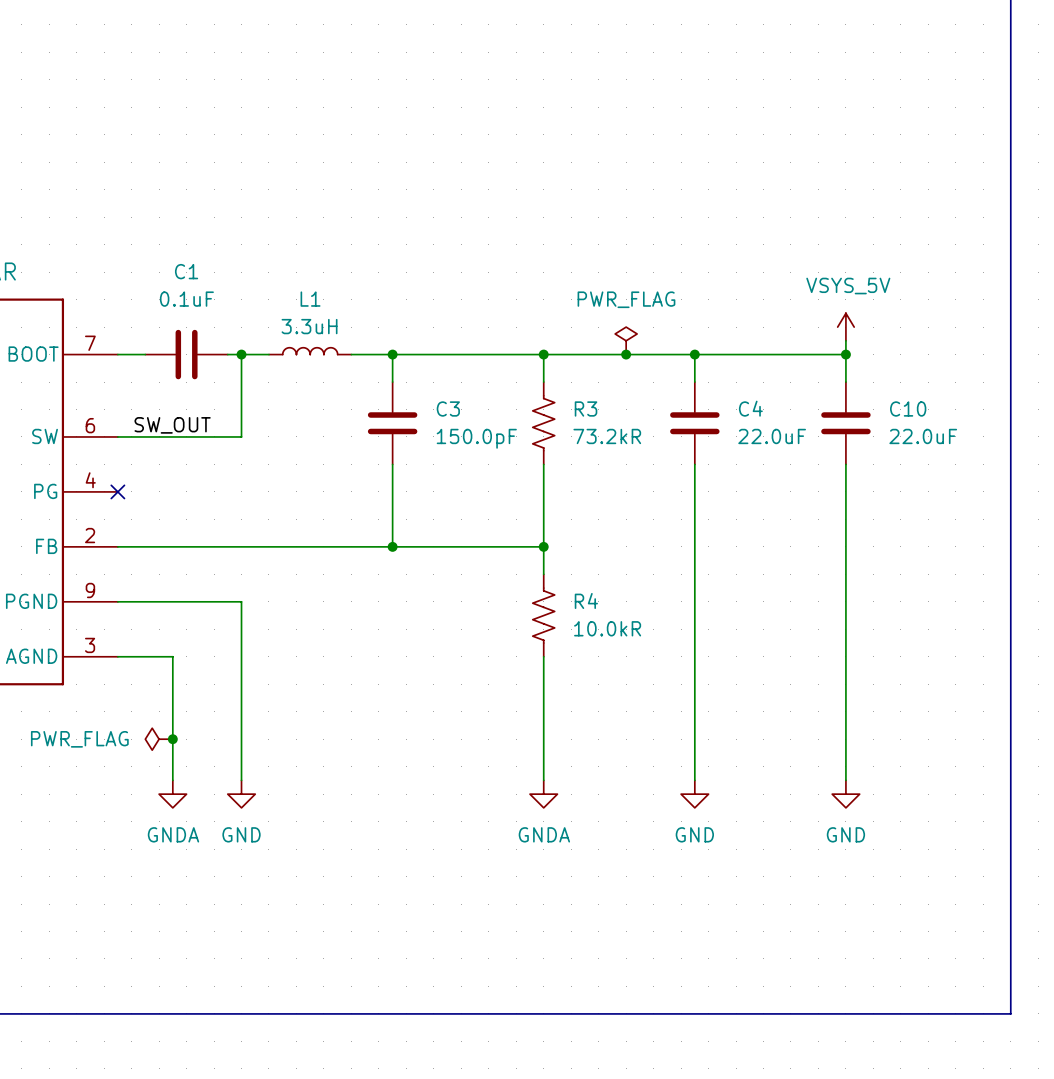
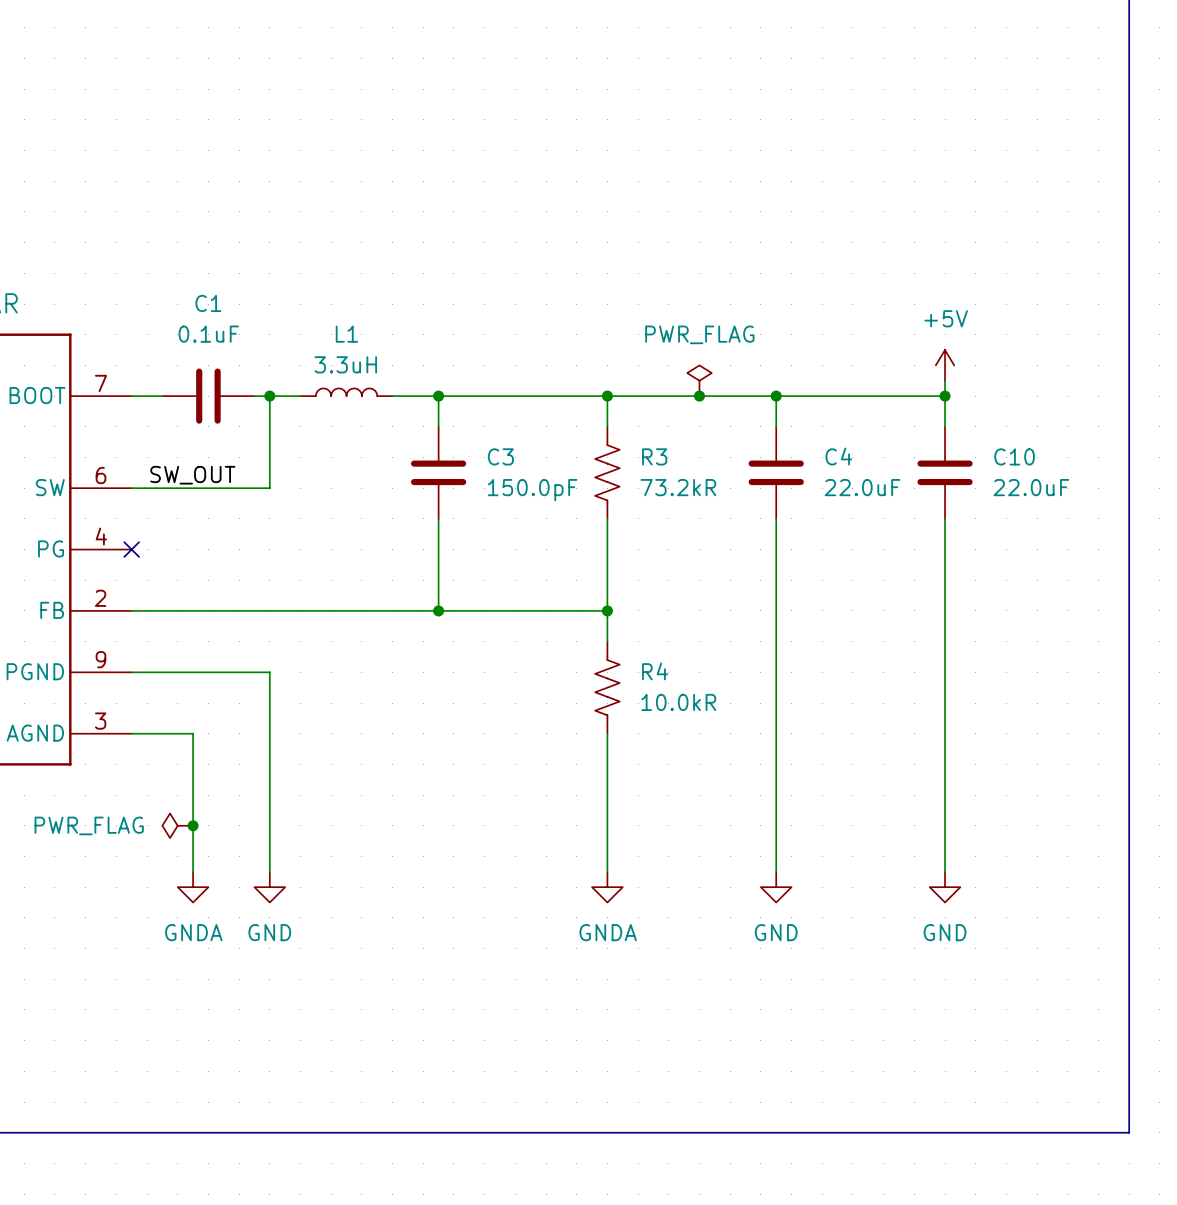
power symbol: VSYS_5V (845, 327) -> +5V (945, 365)

